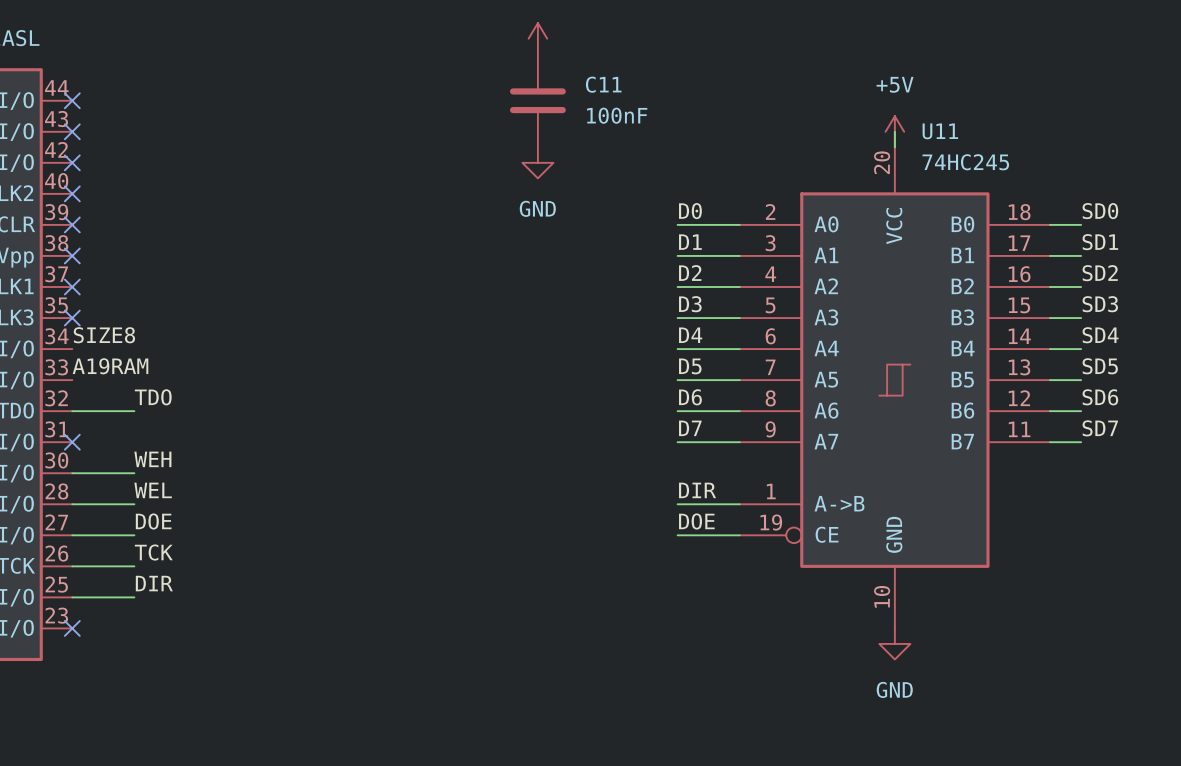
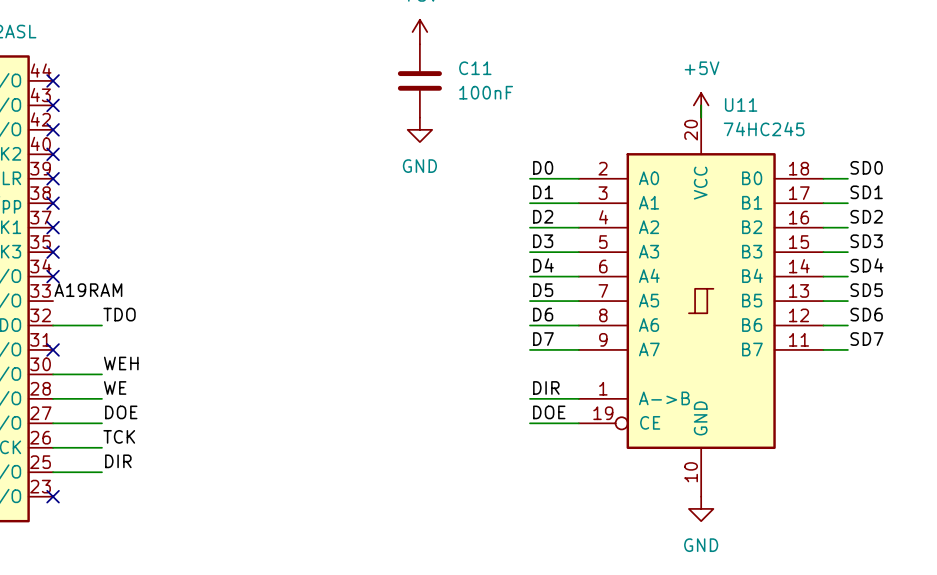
label: SIZE8 (104, 335) -> none
no-connect mark: none -> (53, 276)
label: WEL (153, 490) -> WE (115, 387)

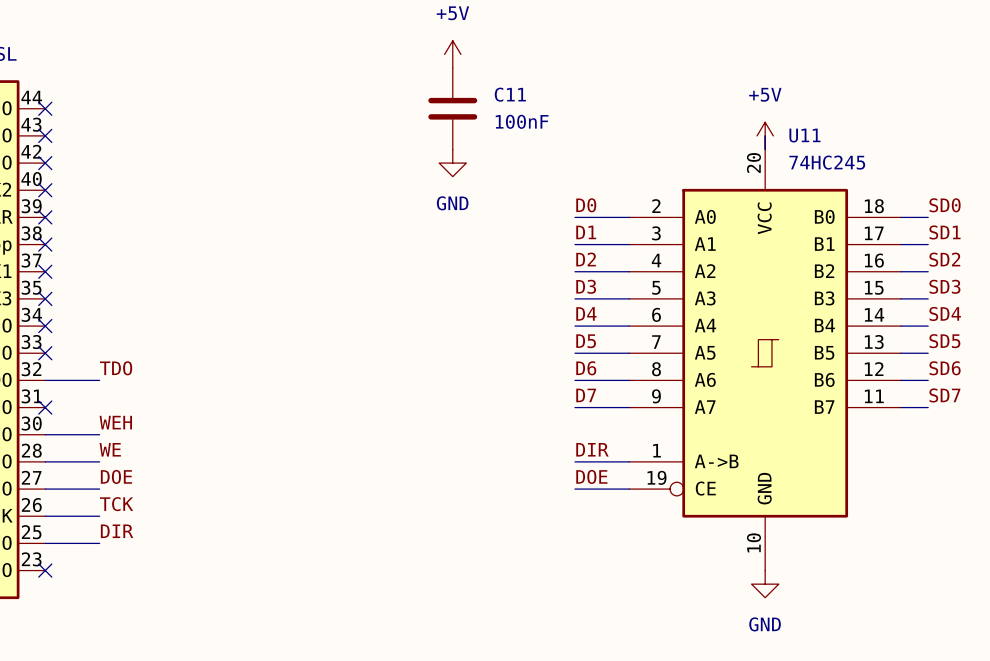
label: A19RAM (88, 290) -> none
no-connect mark: none -> (45, 353)

